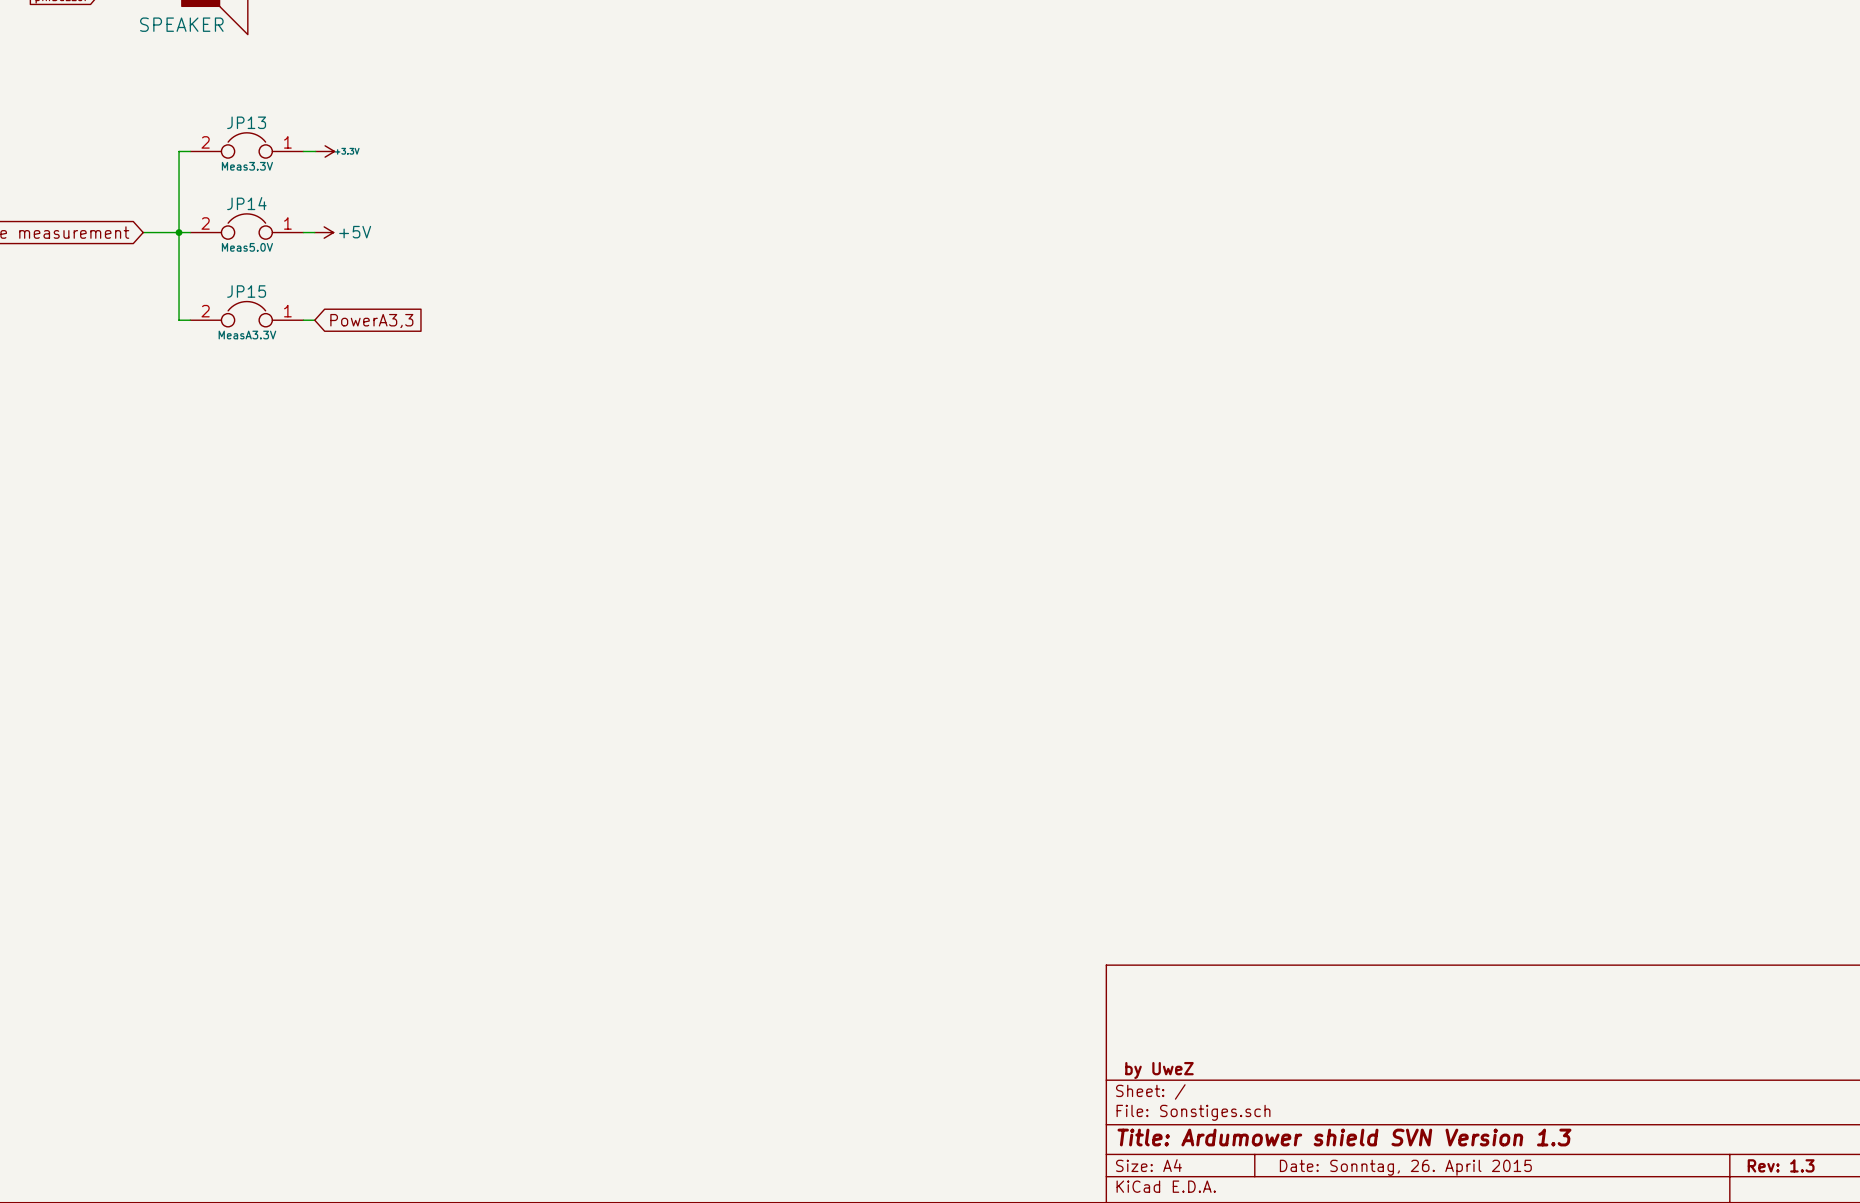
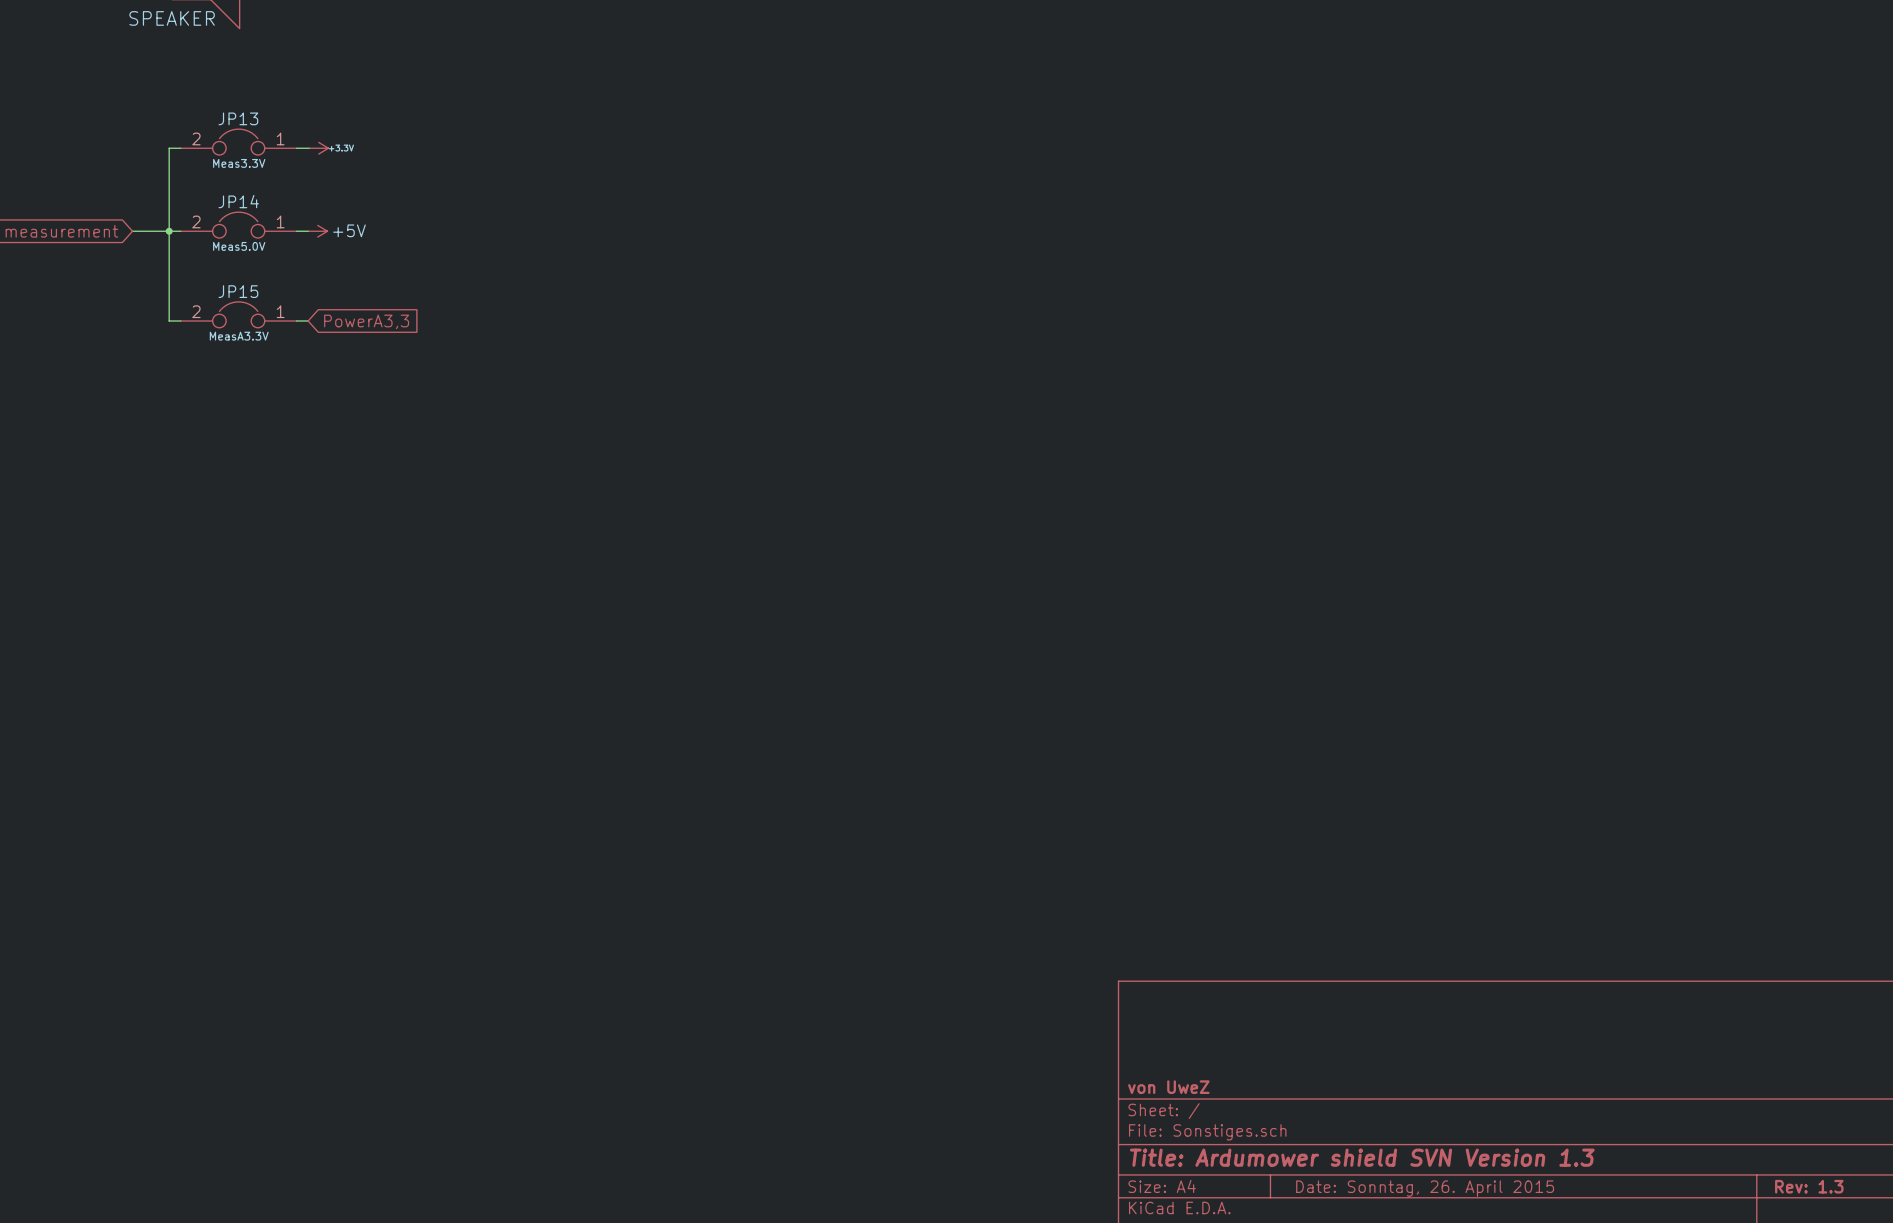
title block: by UweZ (1159, 1070) -> von UweZ (1168, 1087)

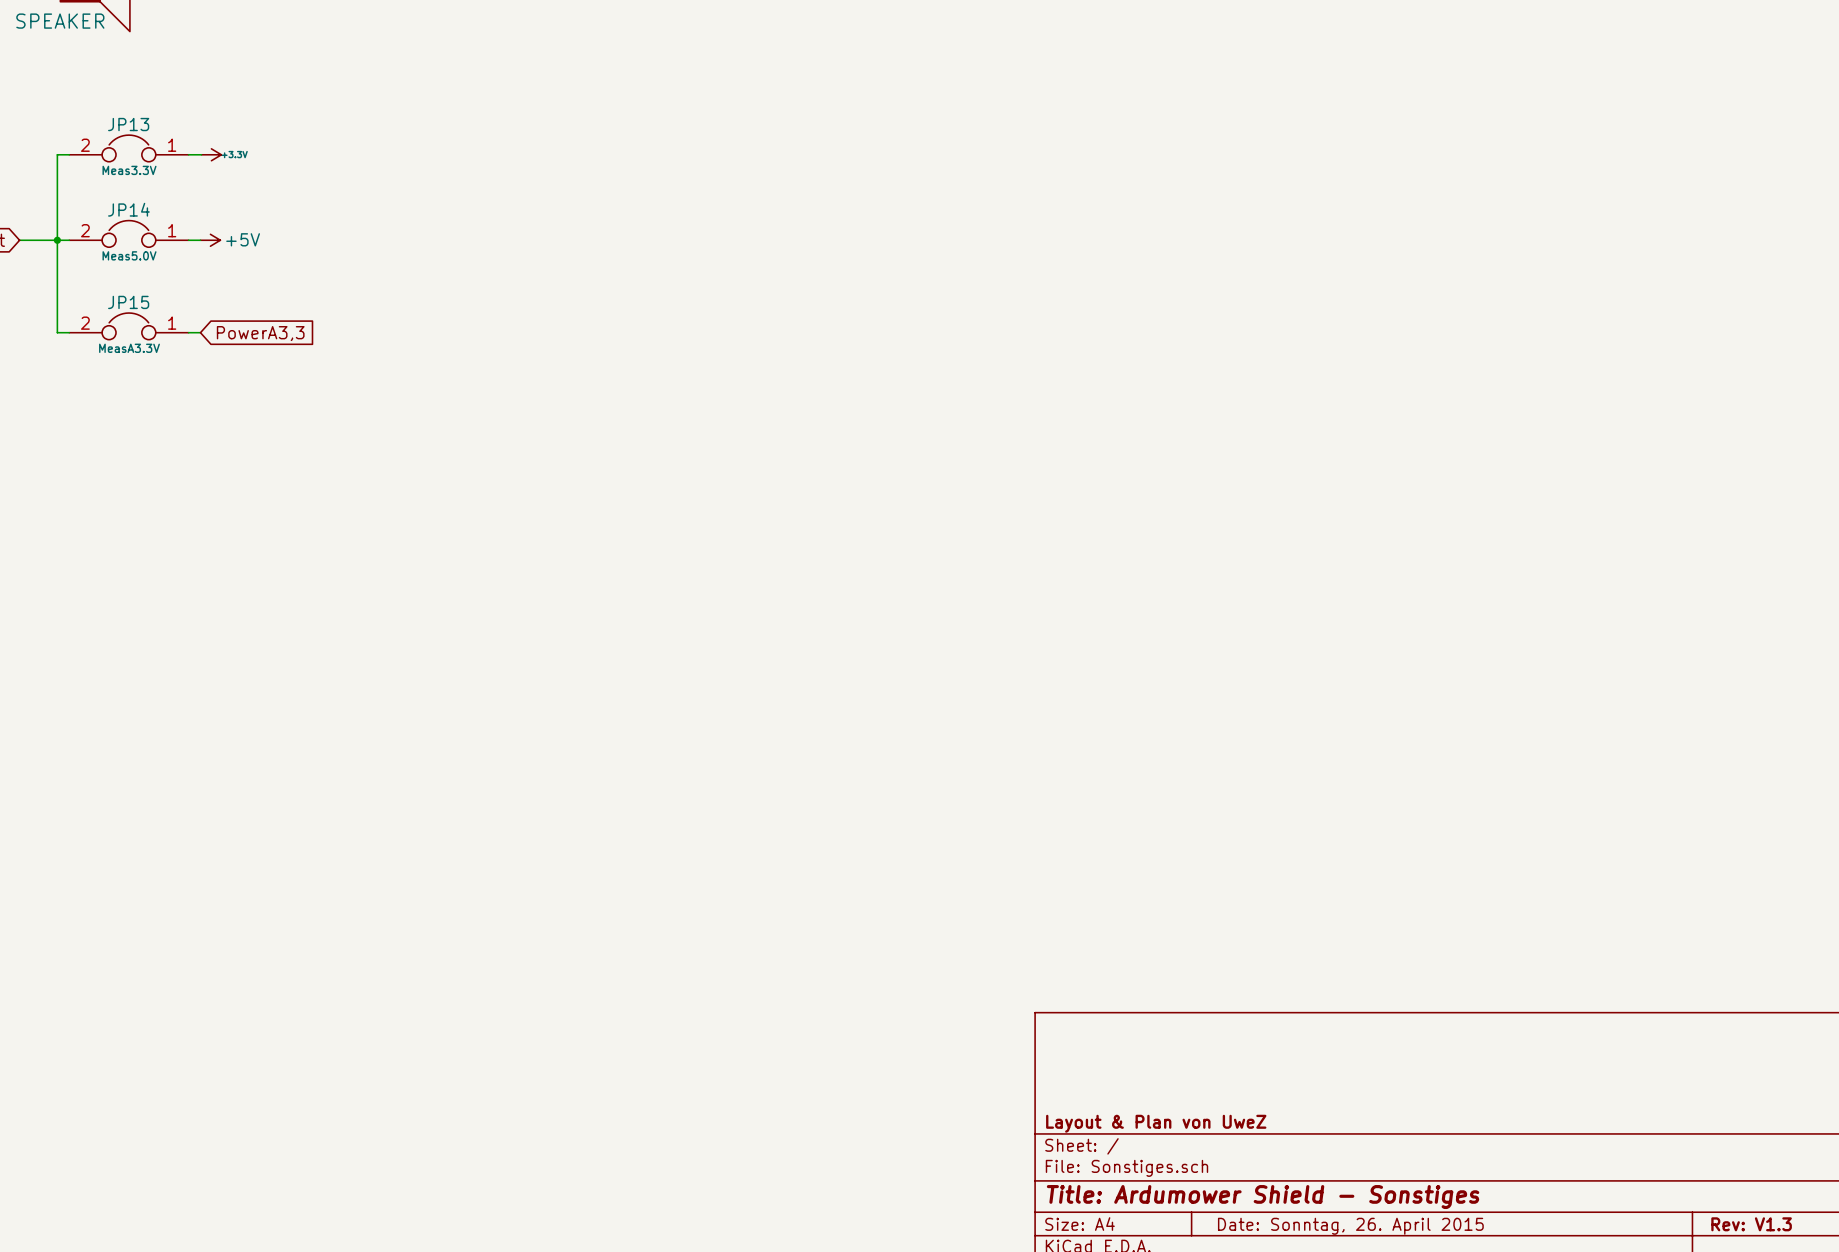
title block: von UweZ (1168, 1087) -> Layout & Plan von UweZ (1156, 1123)
title block: Title: Ardumower shield SVN Version 1.3 (1362, 1157) -> Title: Ardumower Shield - Sonstiges (1263, 1197)
title block: Rev: 1.3 (1809, 1186) -> Rev: V1.3 (1751, 1224)

